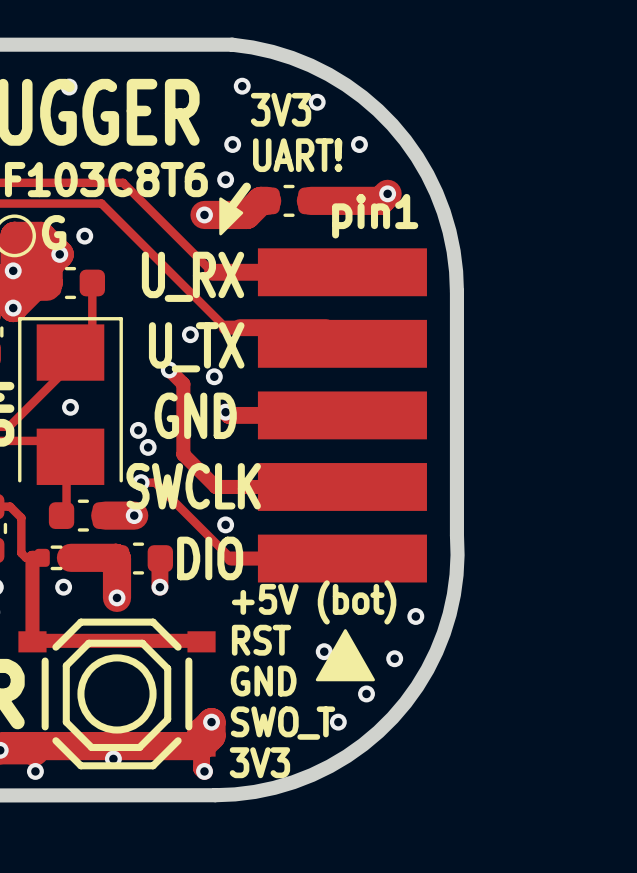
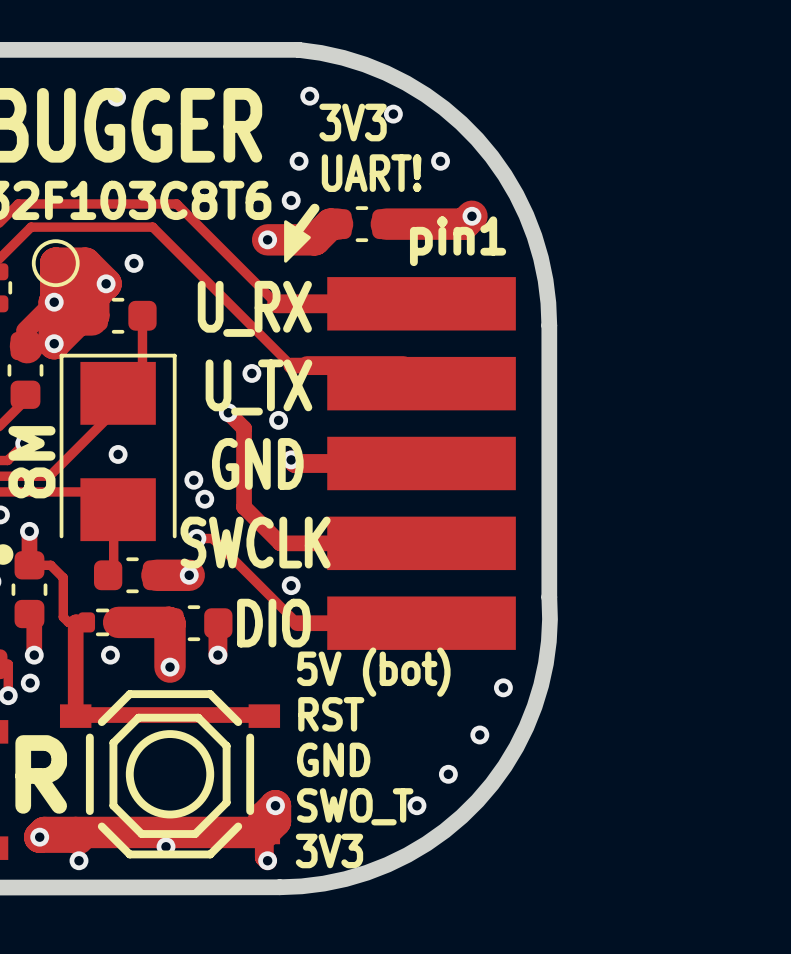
text: G (54, 232) -> none
text: +5V (bot) (314, 602) -> 5V (bot) (373, 672)
drawing: [315, 629, 375, 682] -> none
via: (324, 651) -> none

